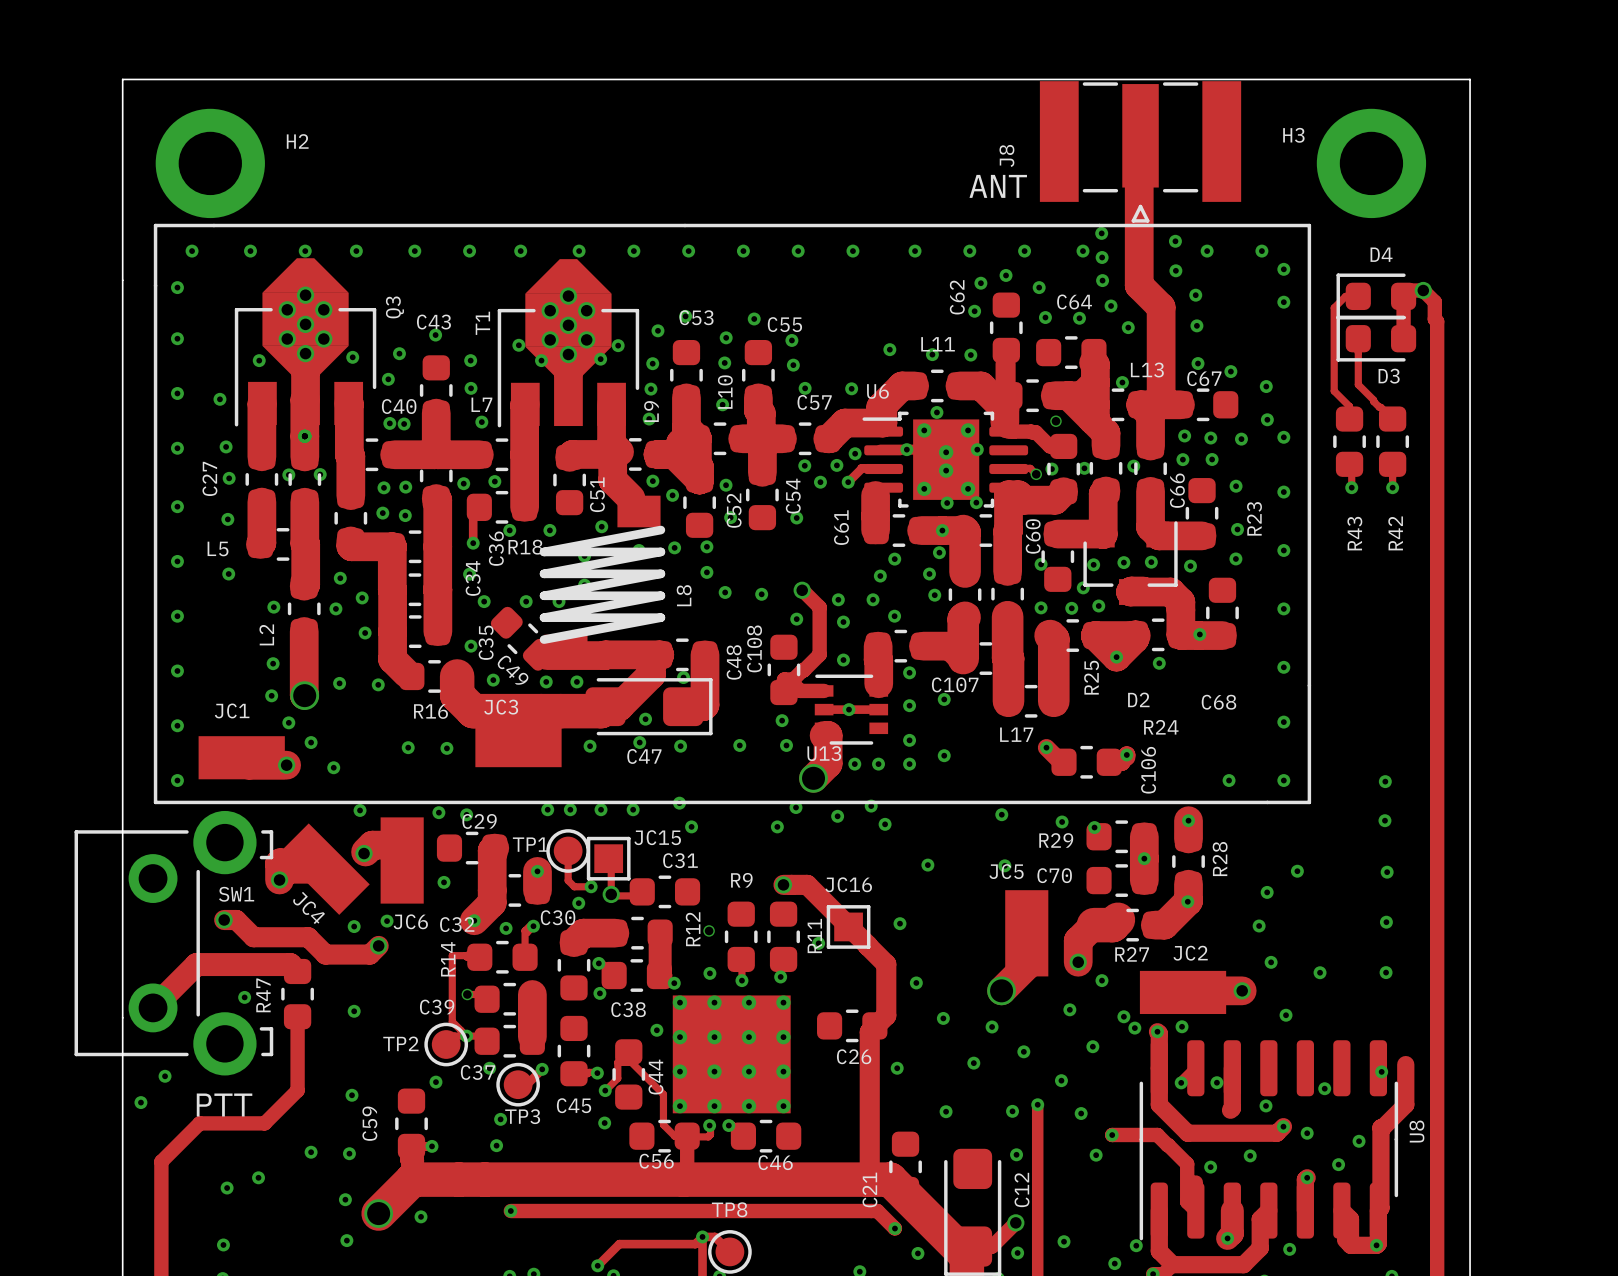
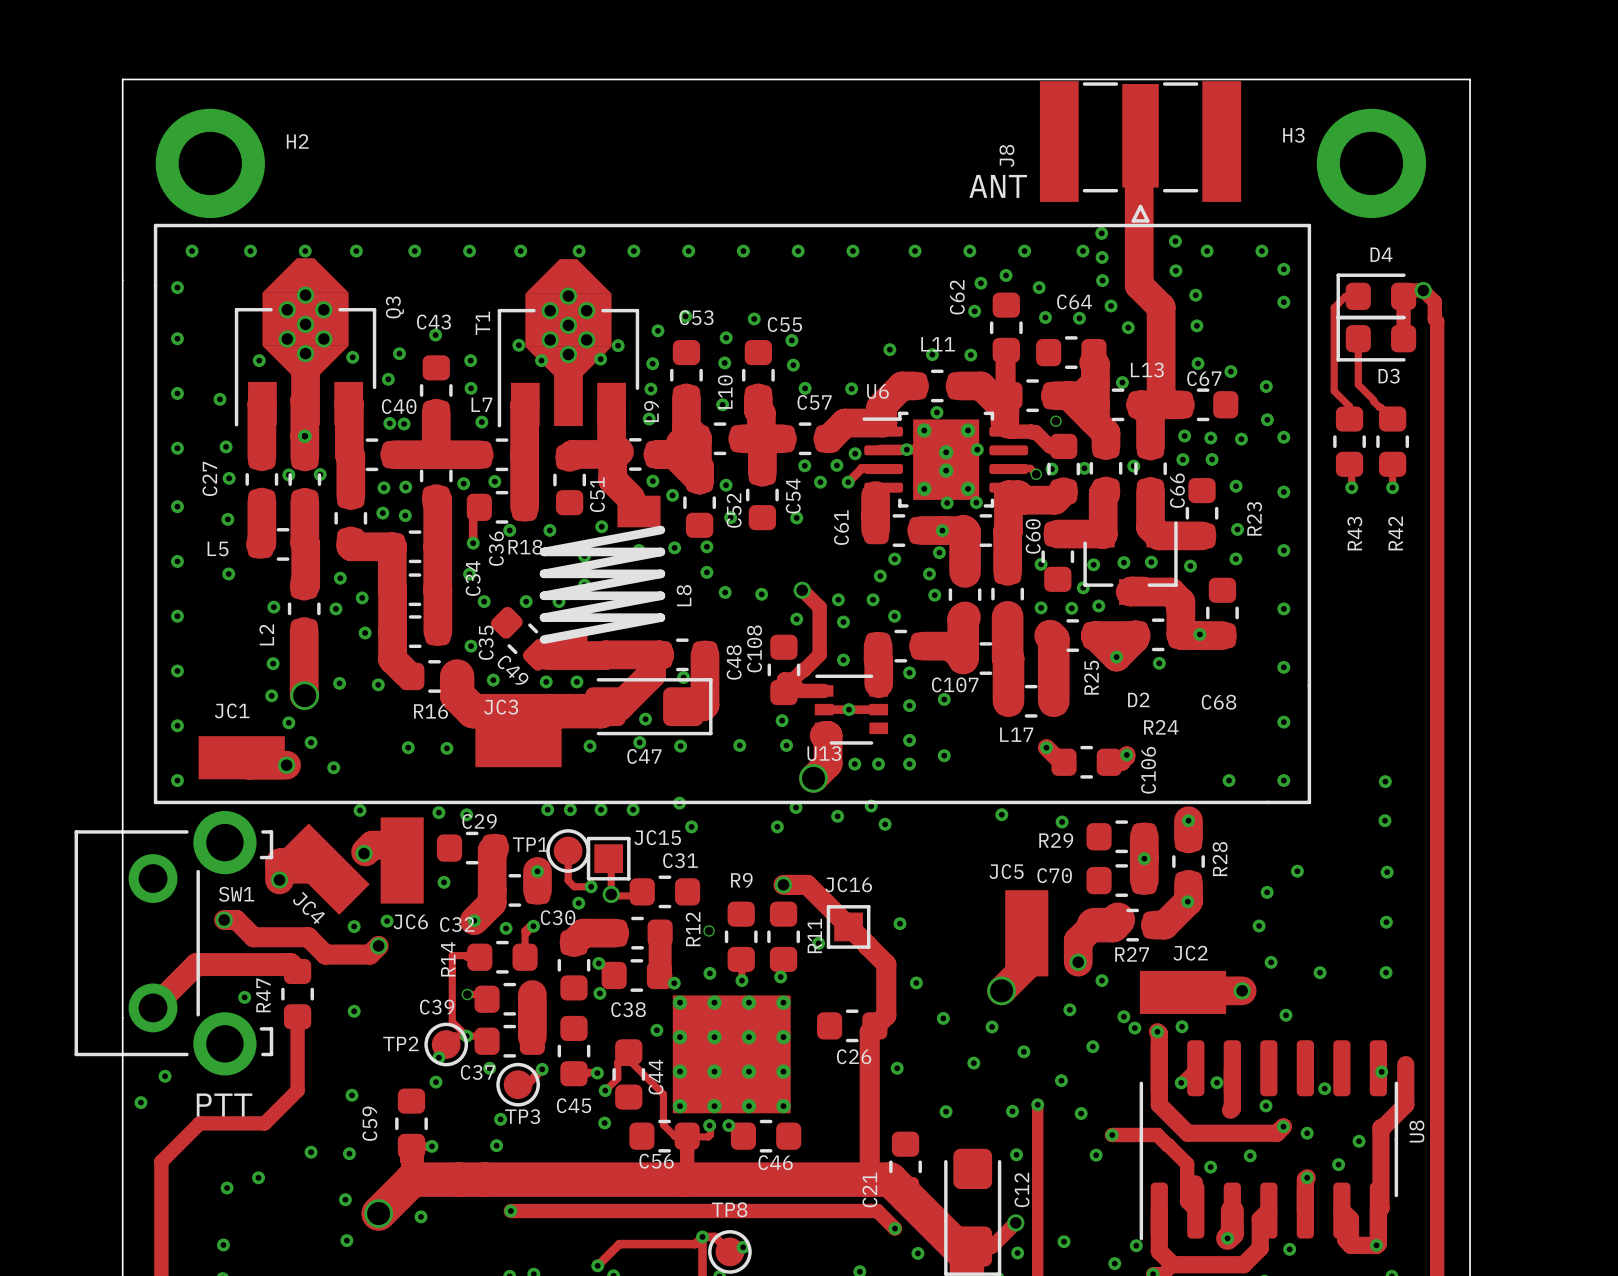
via: (1094, 827) -> none
via: (927, 865) -> none
via: (1004, 865) -> none
via: none -> (438, 1057)
via: none -> (743, 1247)

